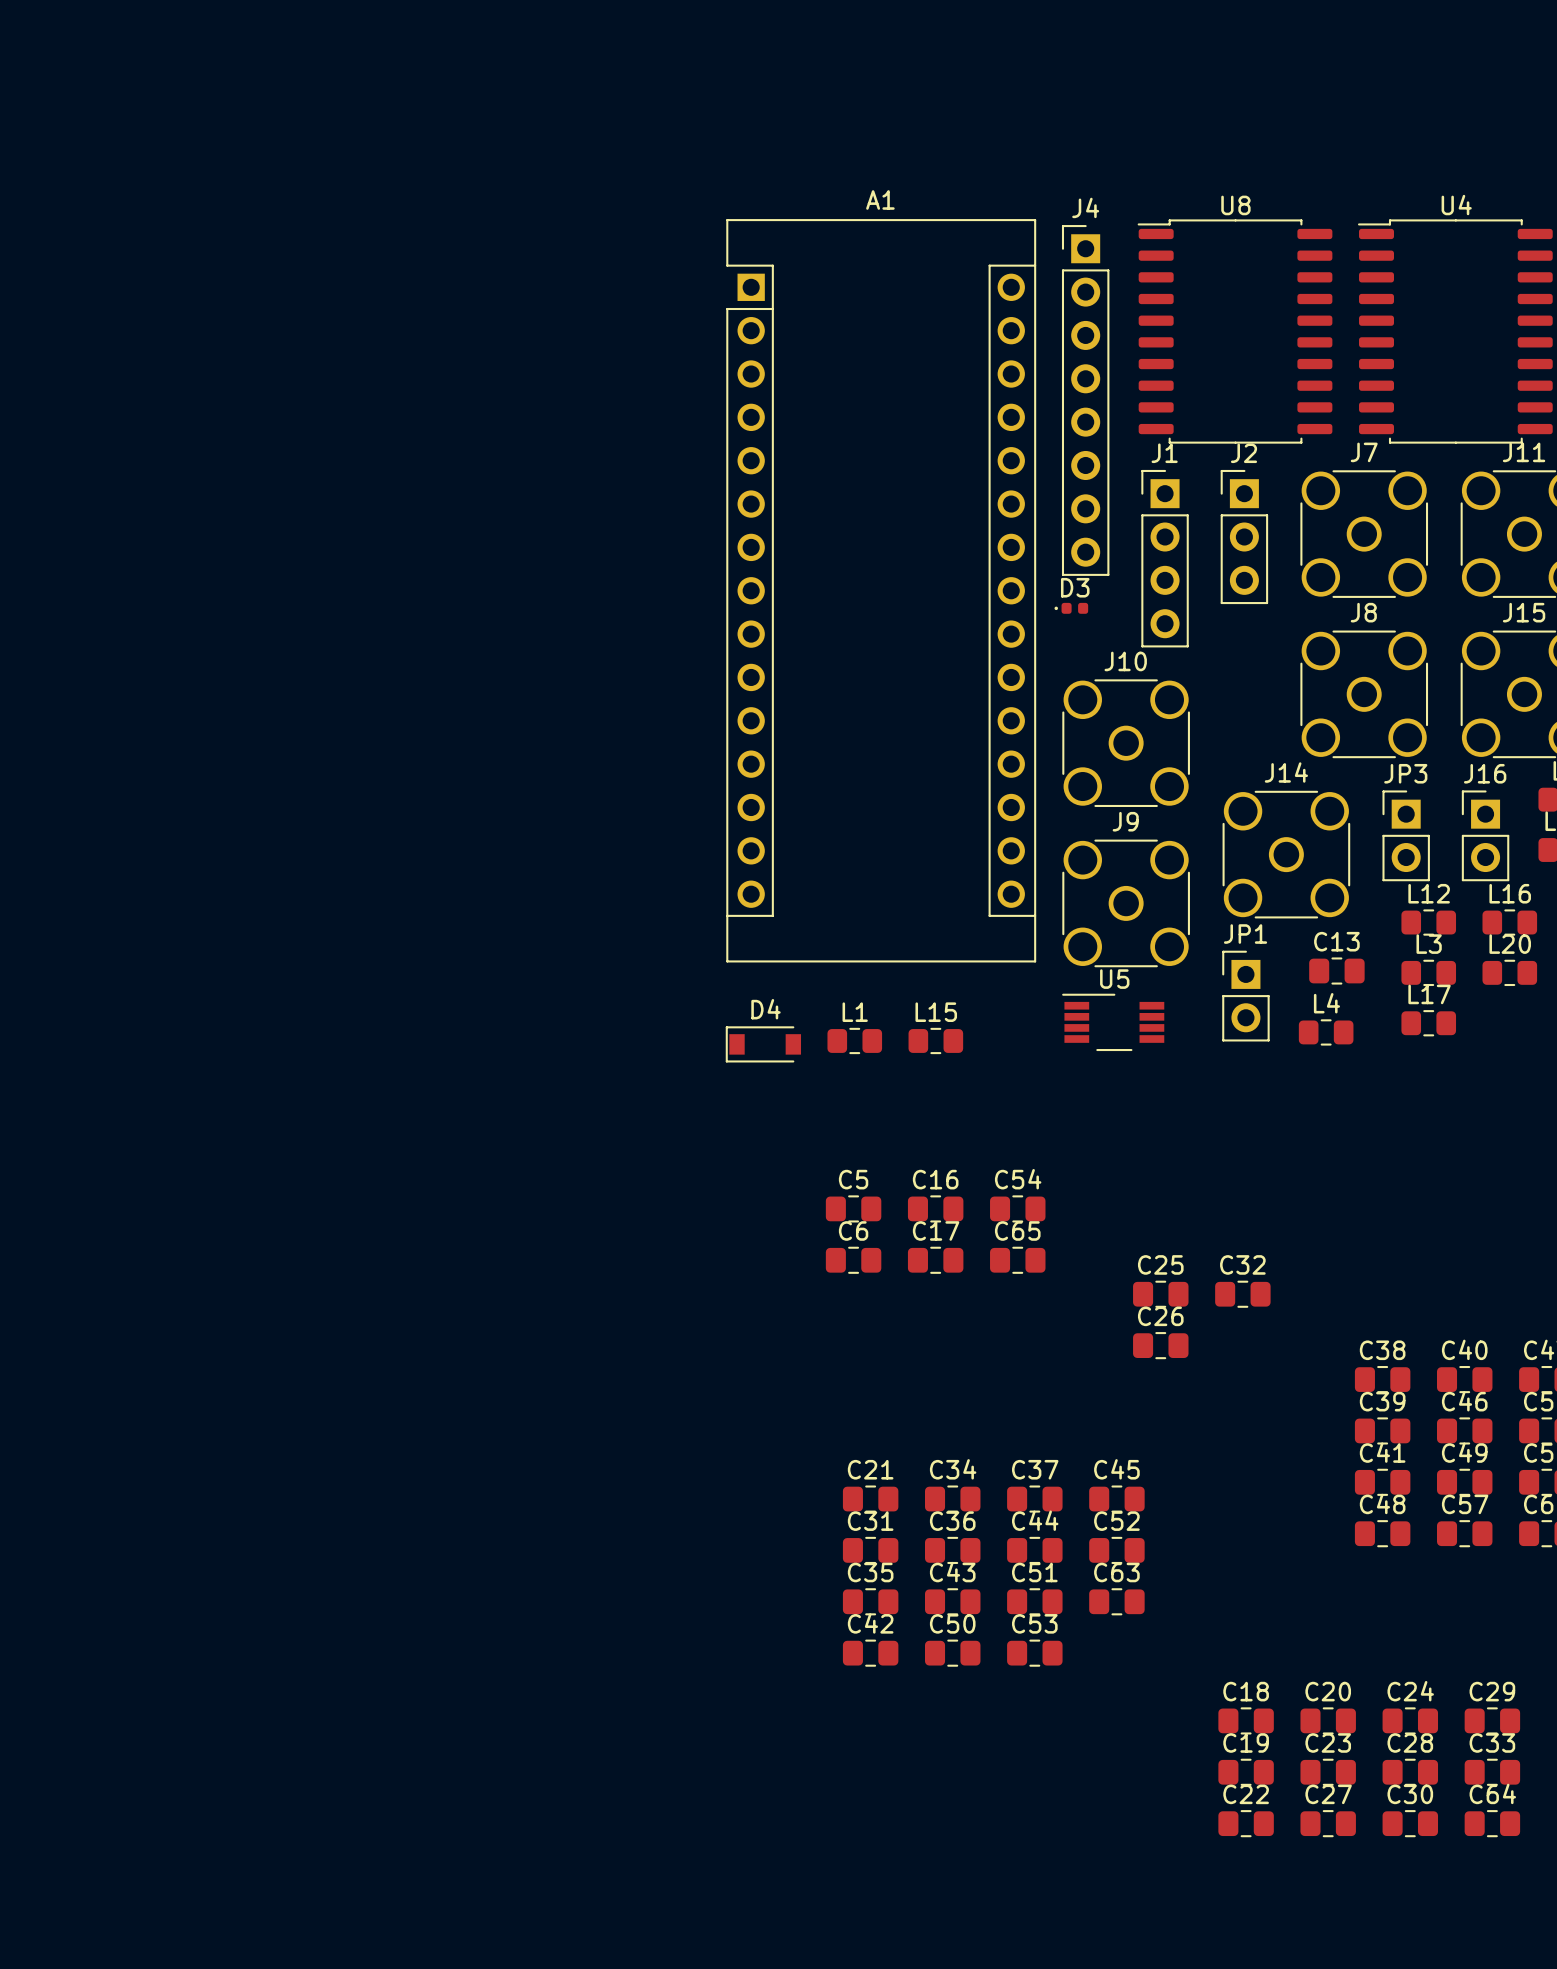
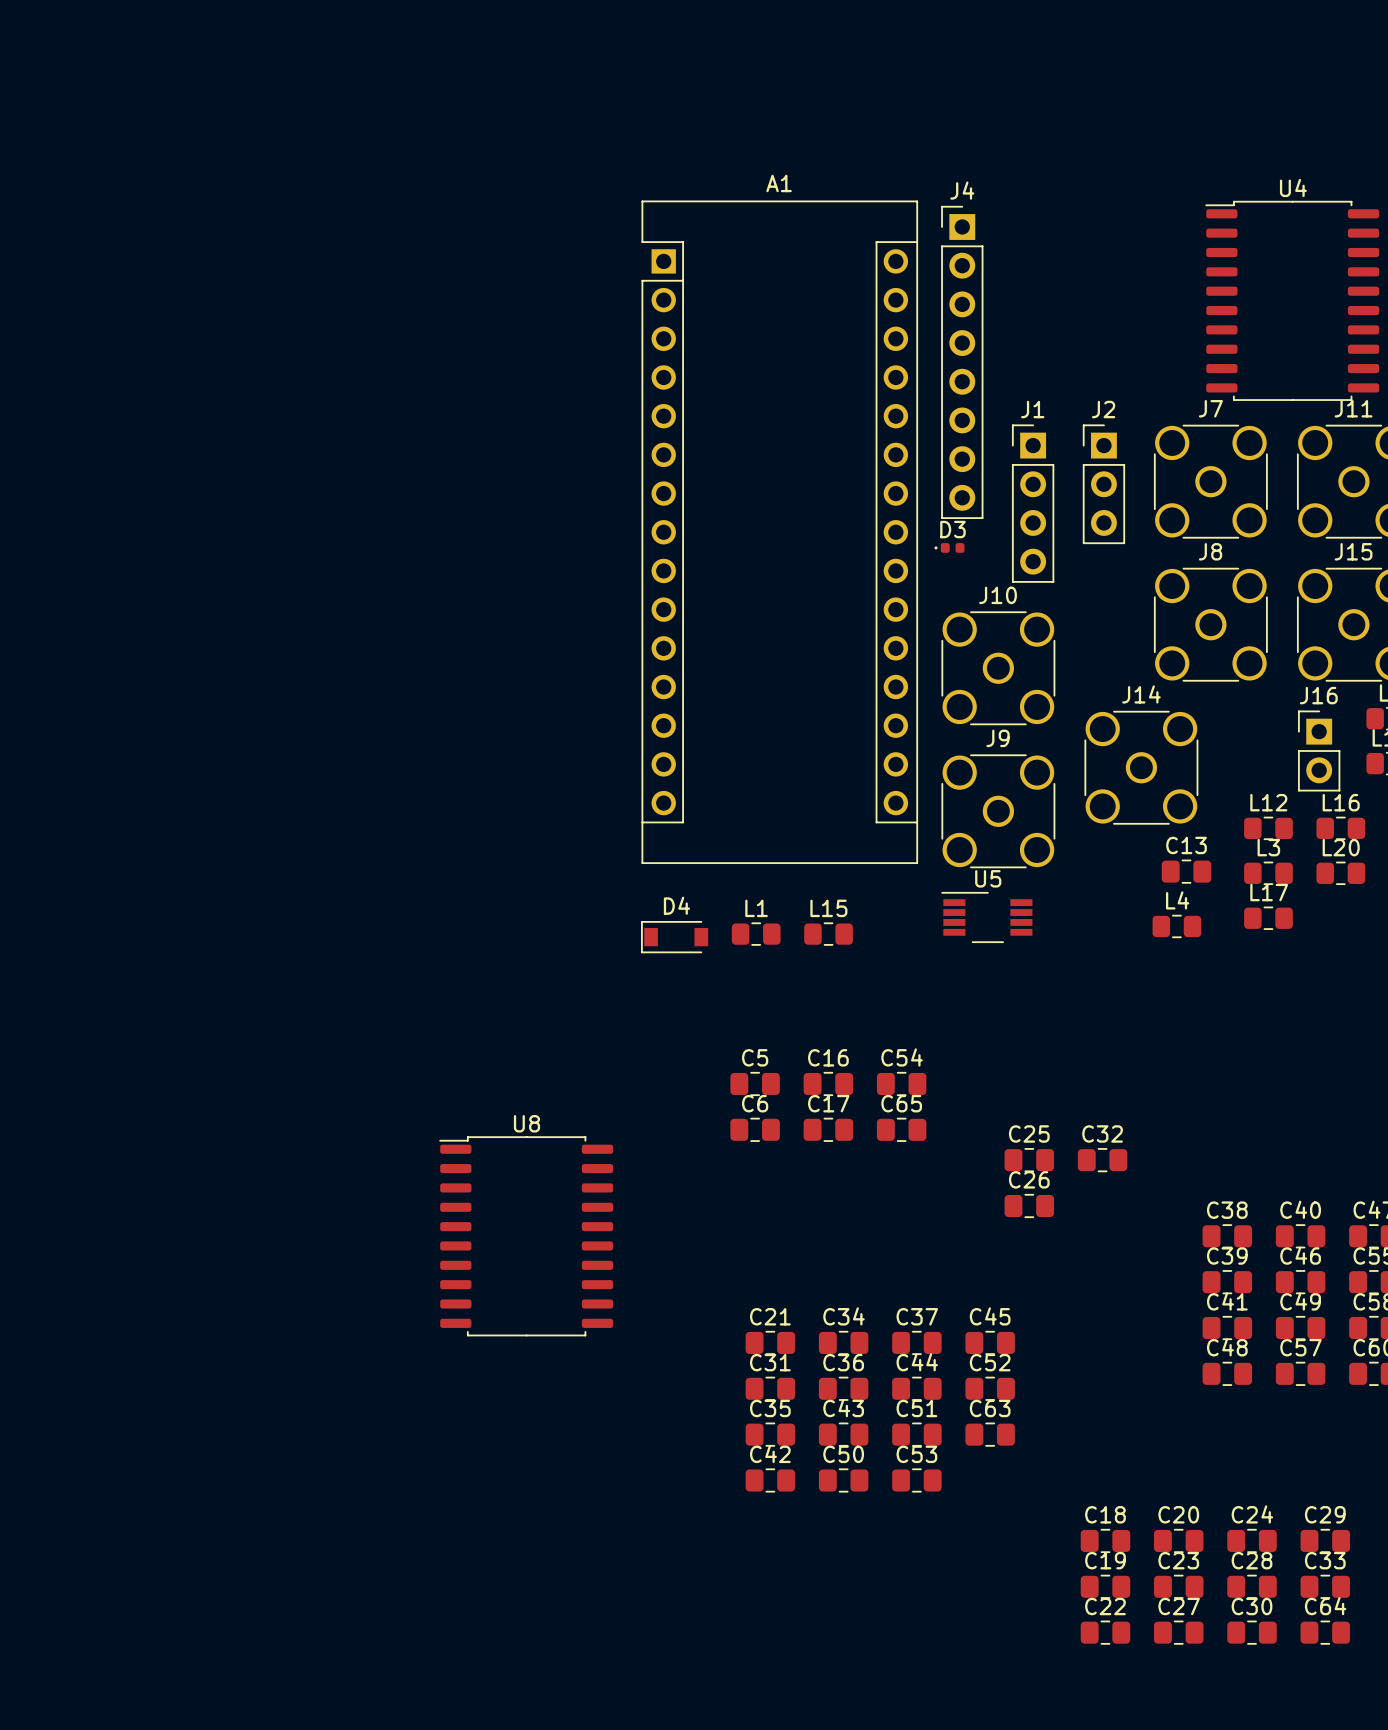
U8 position: (1235, 331) -> (526, 1236)
JP3: (1406, 835) -> none
JP1: (1245, 996) -> none

